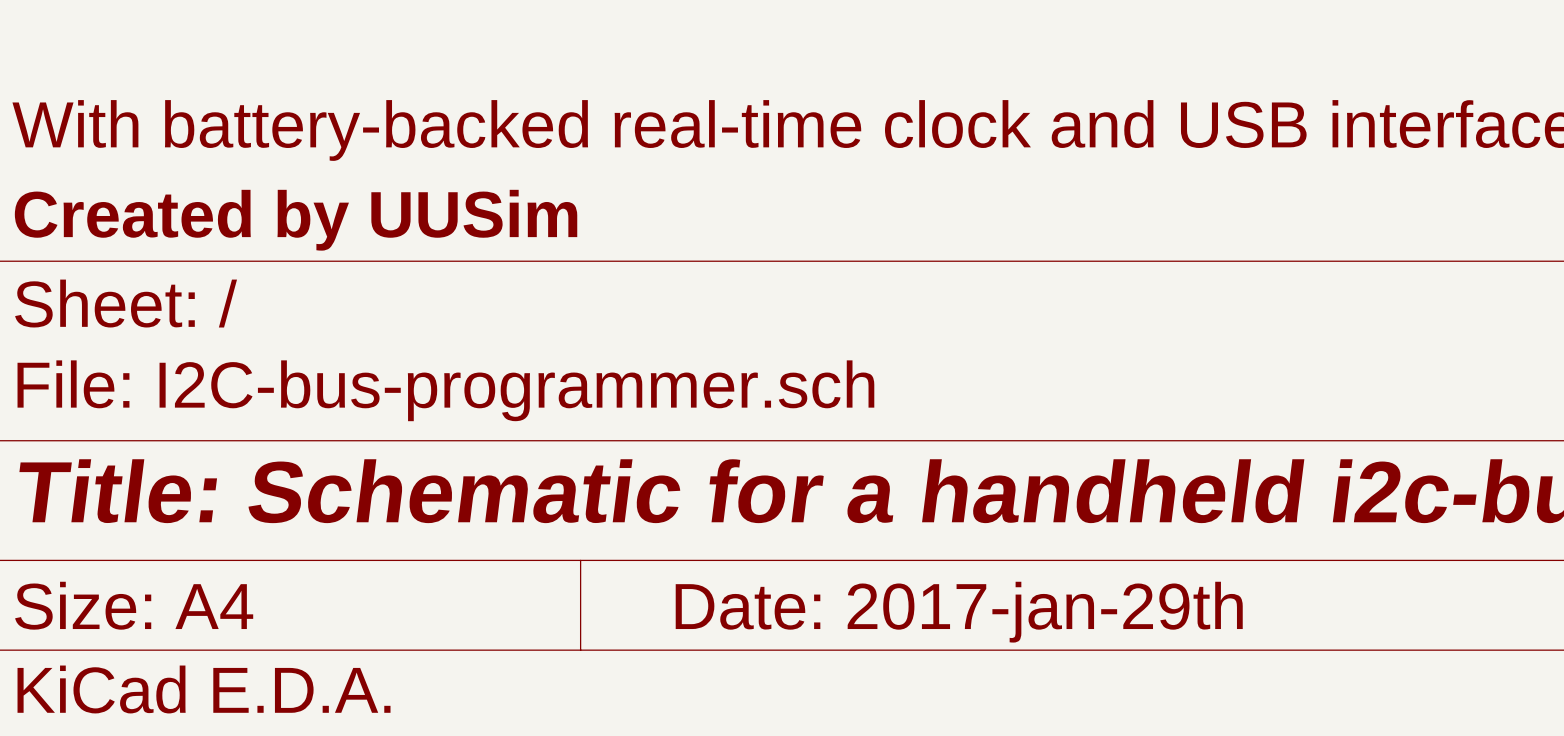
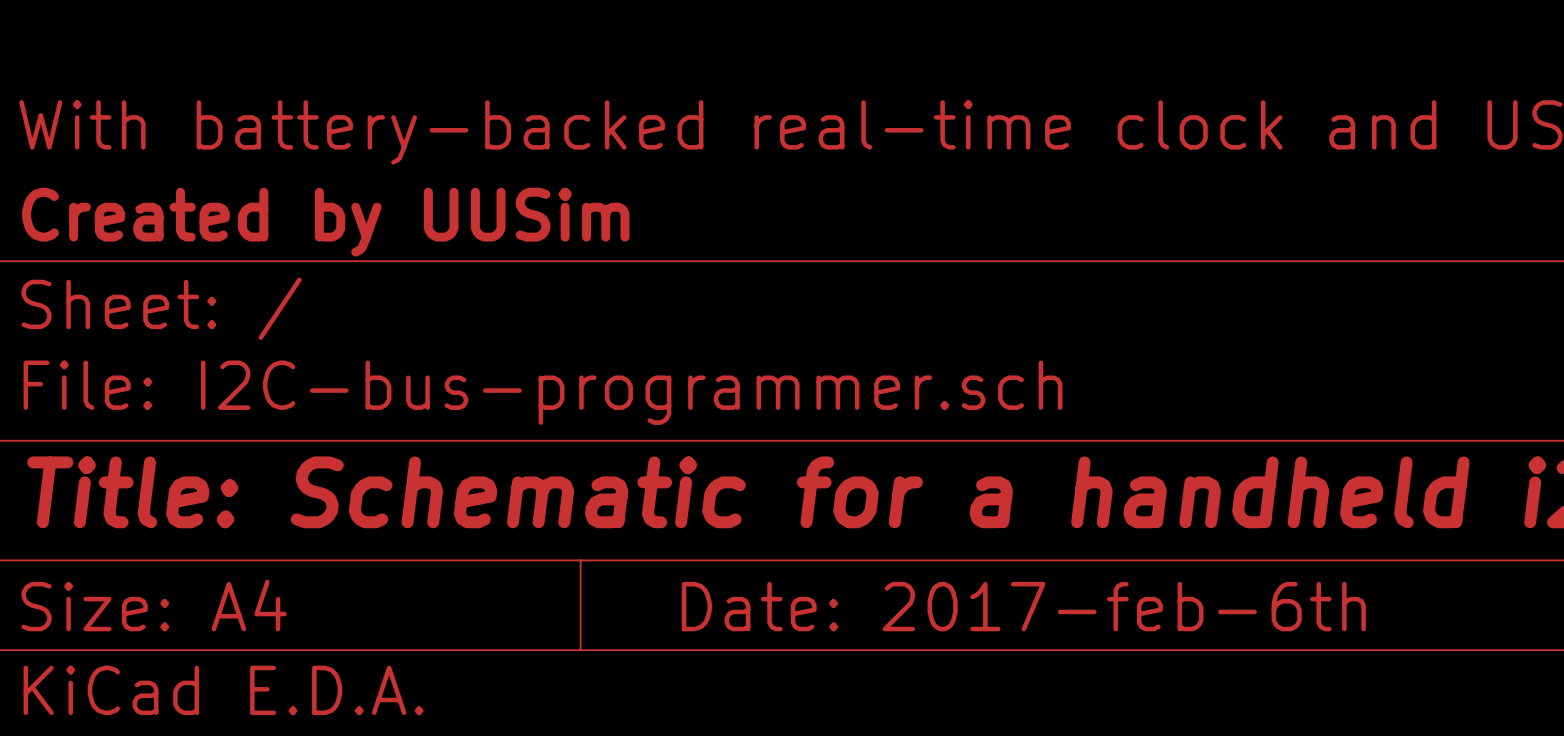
title block: Date: 2017-jan-29th (959, 612) -> Date: 2017-feb-6th (1023, 606)

